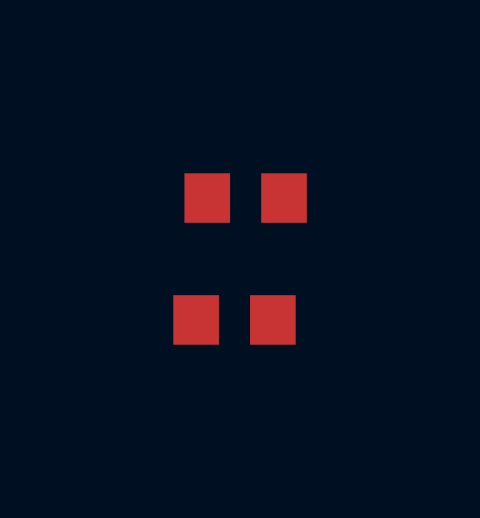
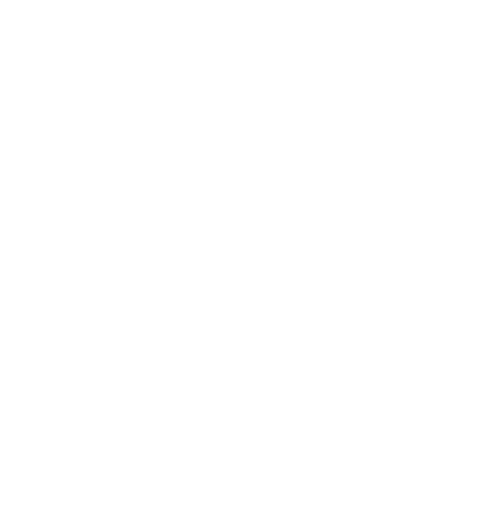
part: (245, 198) -> none
part: (234, 319) -> none

